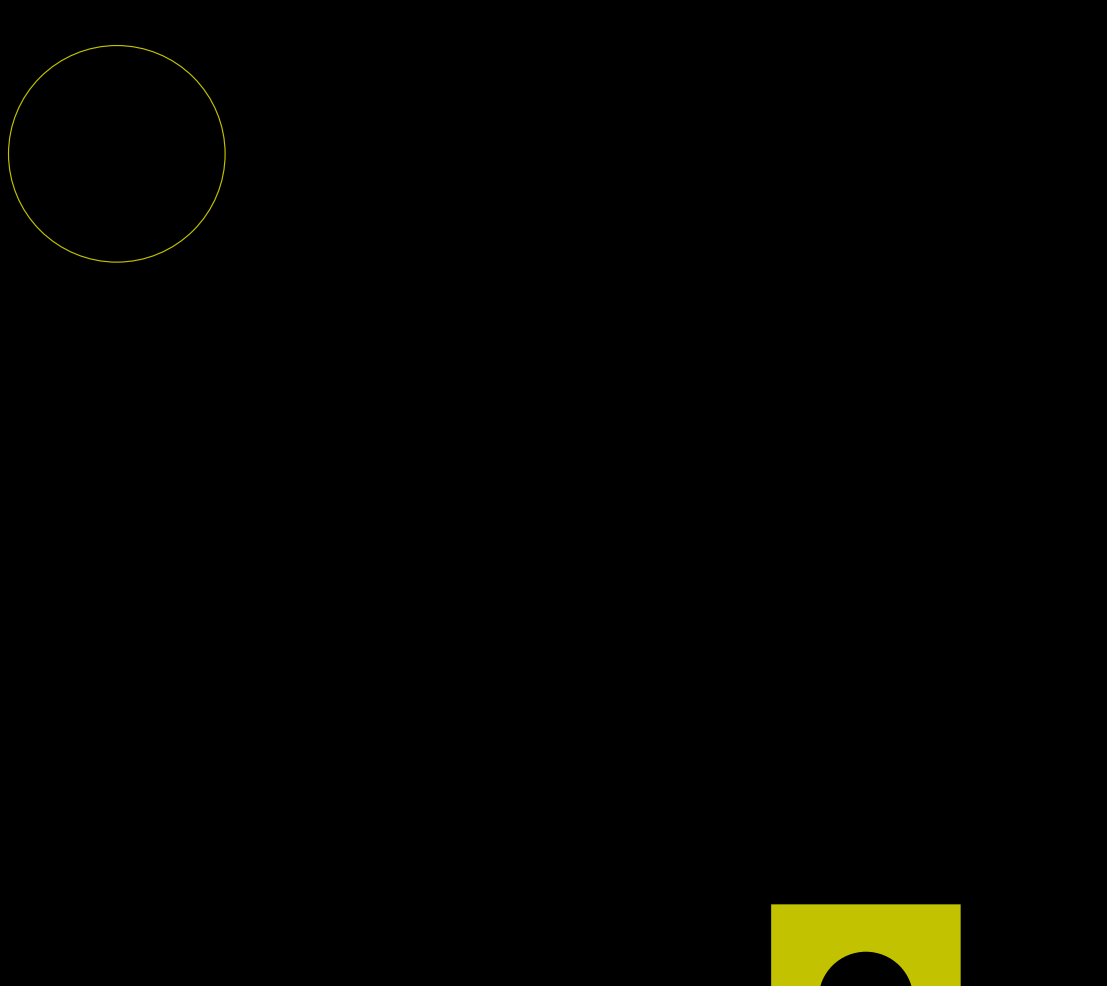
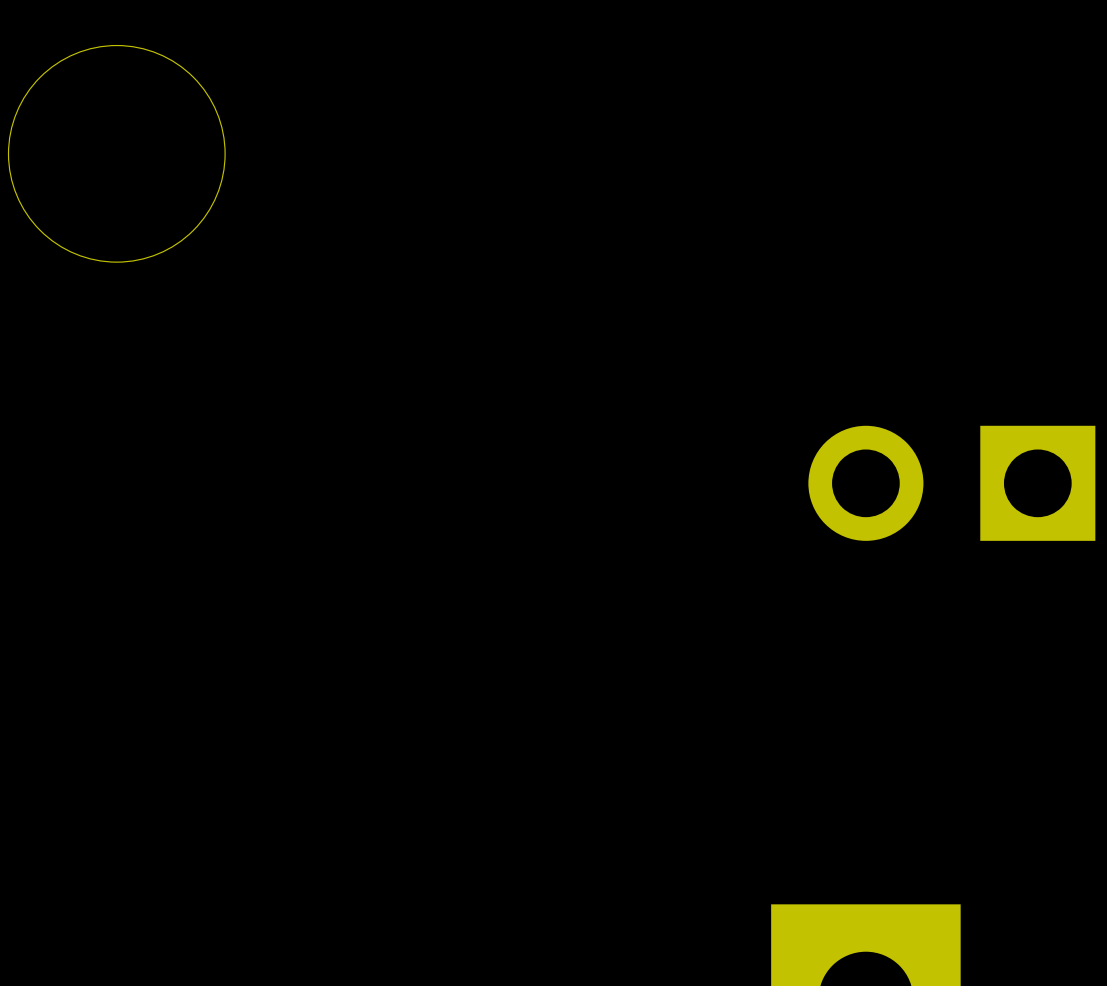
part: none -> (951, 483)

